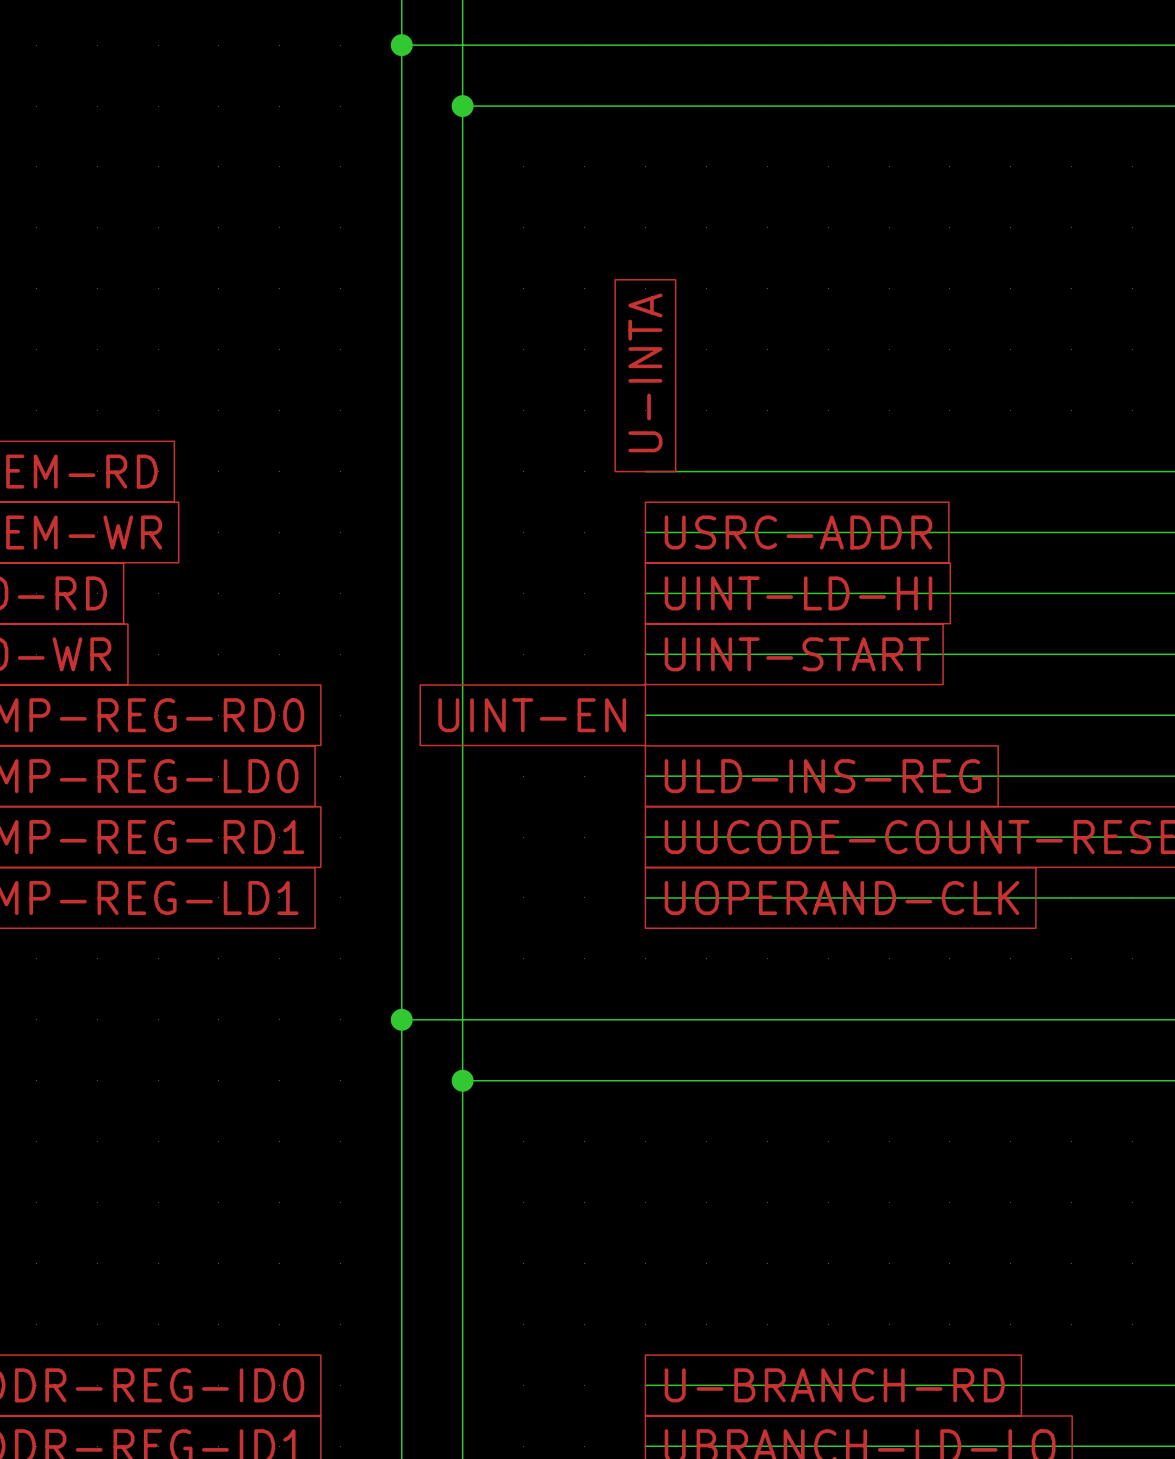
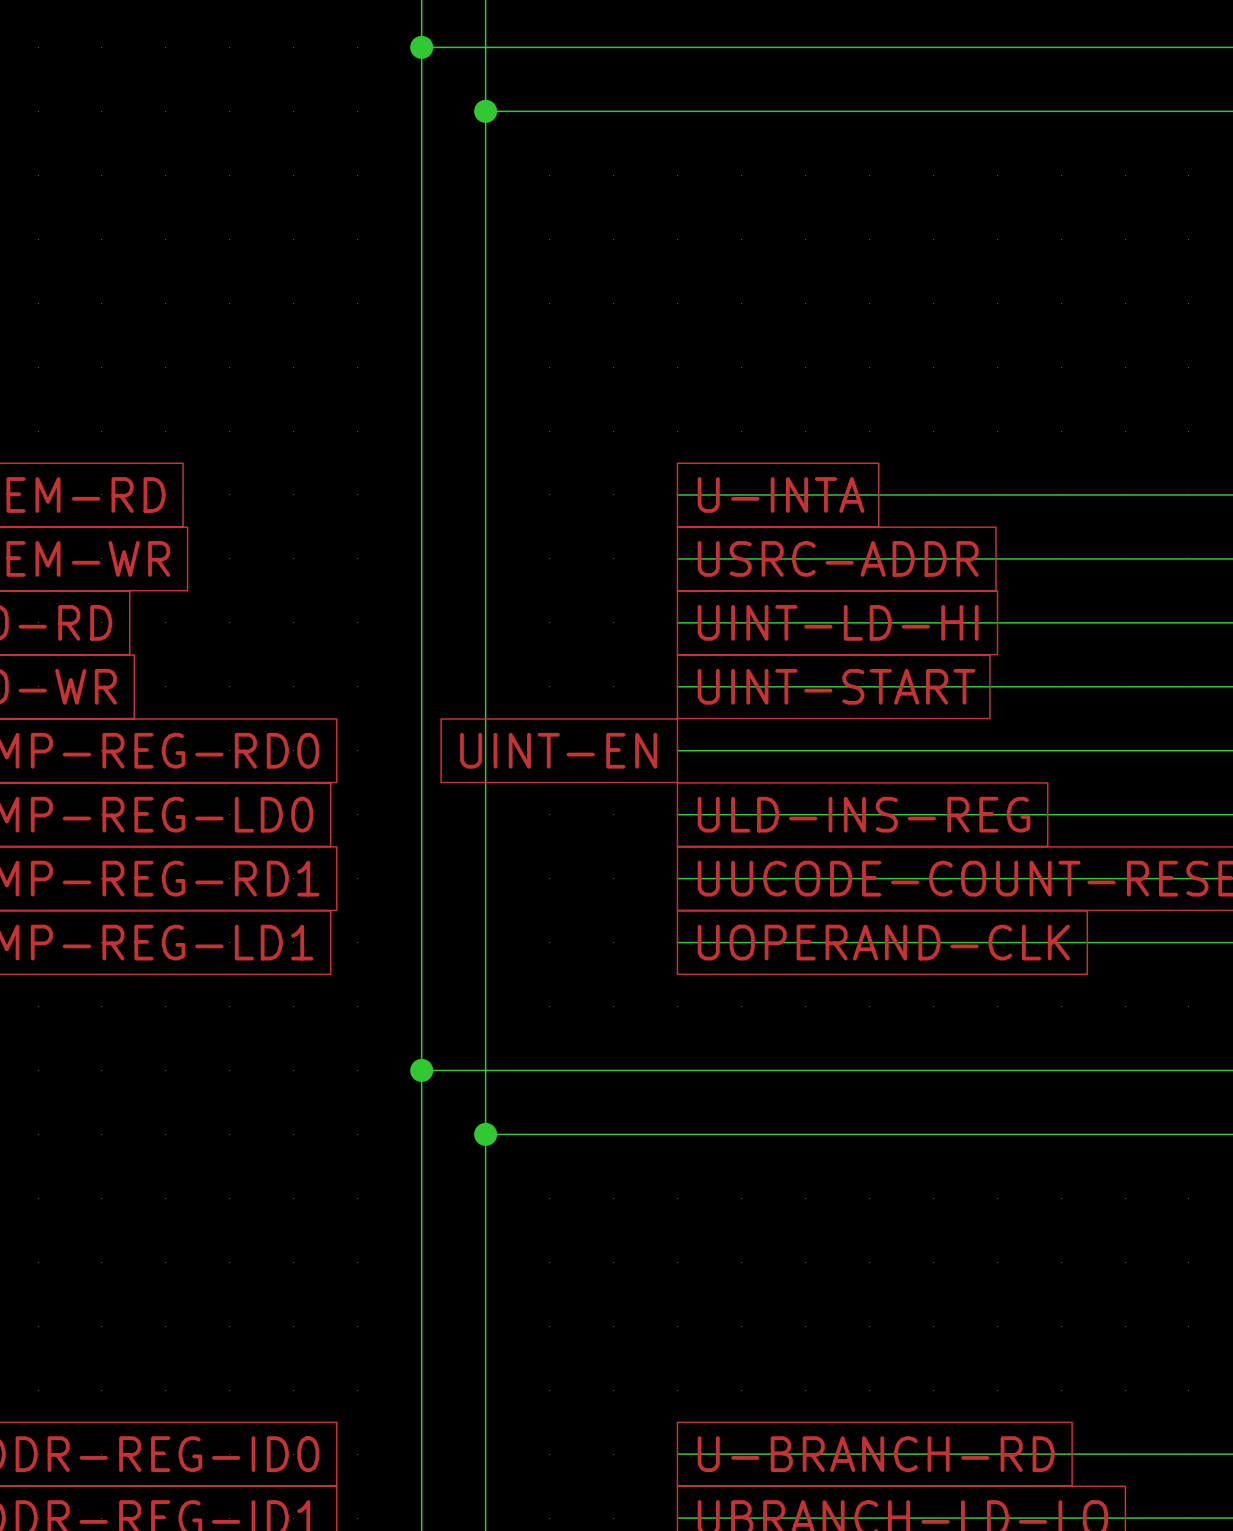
global label rotation: 0° (645, 372) -> 90° clockwise (781, 494)

